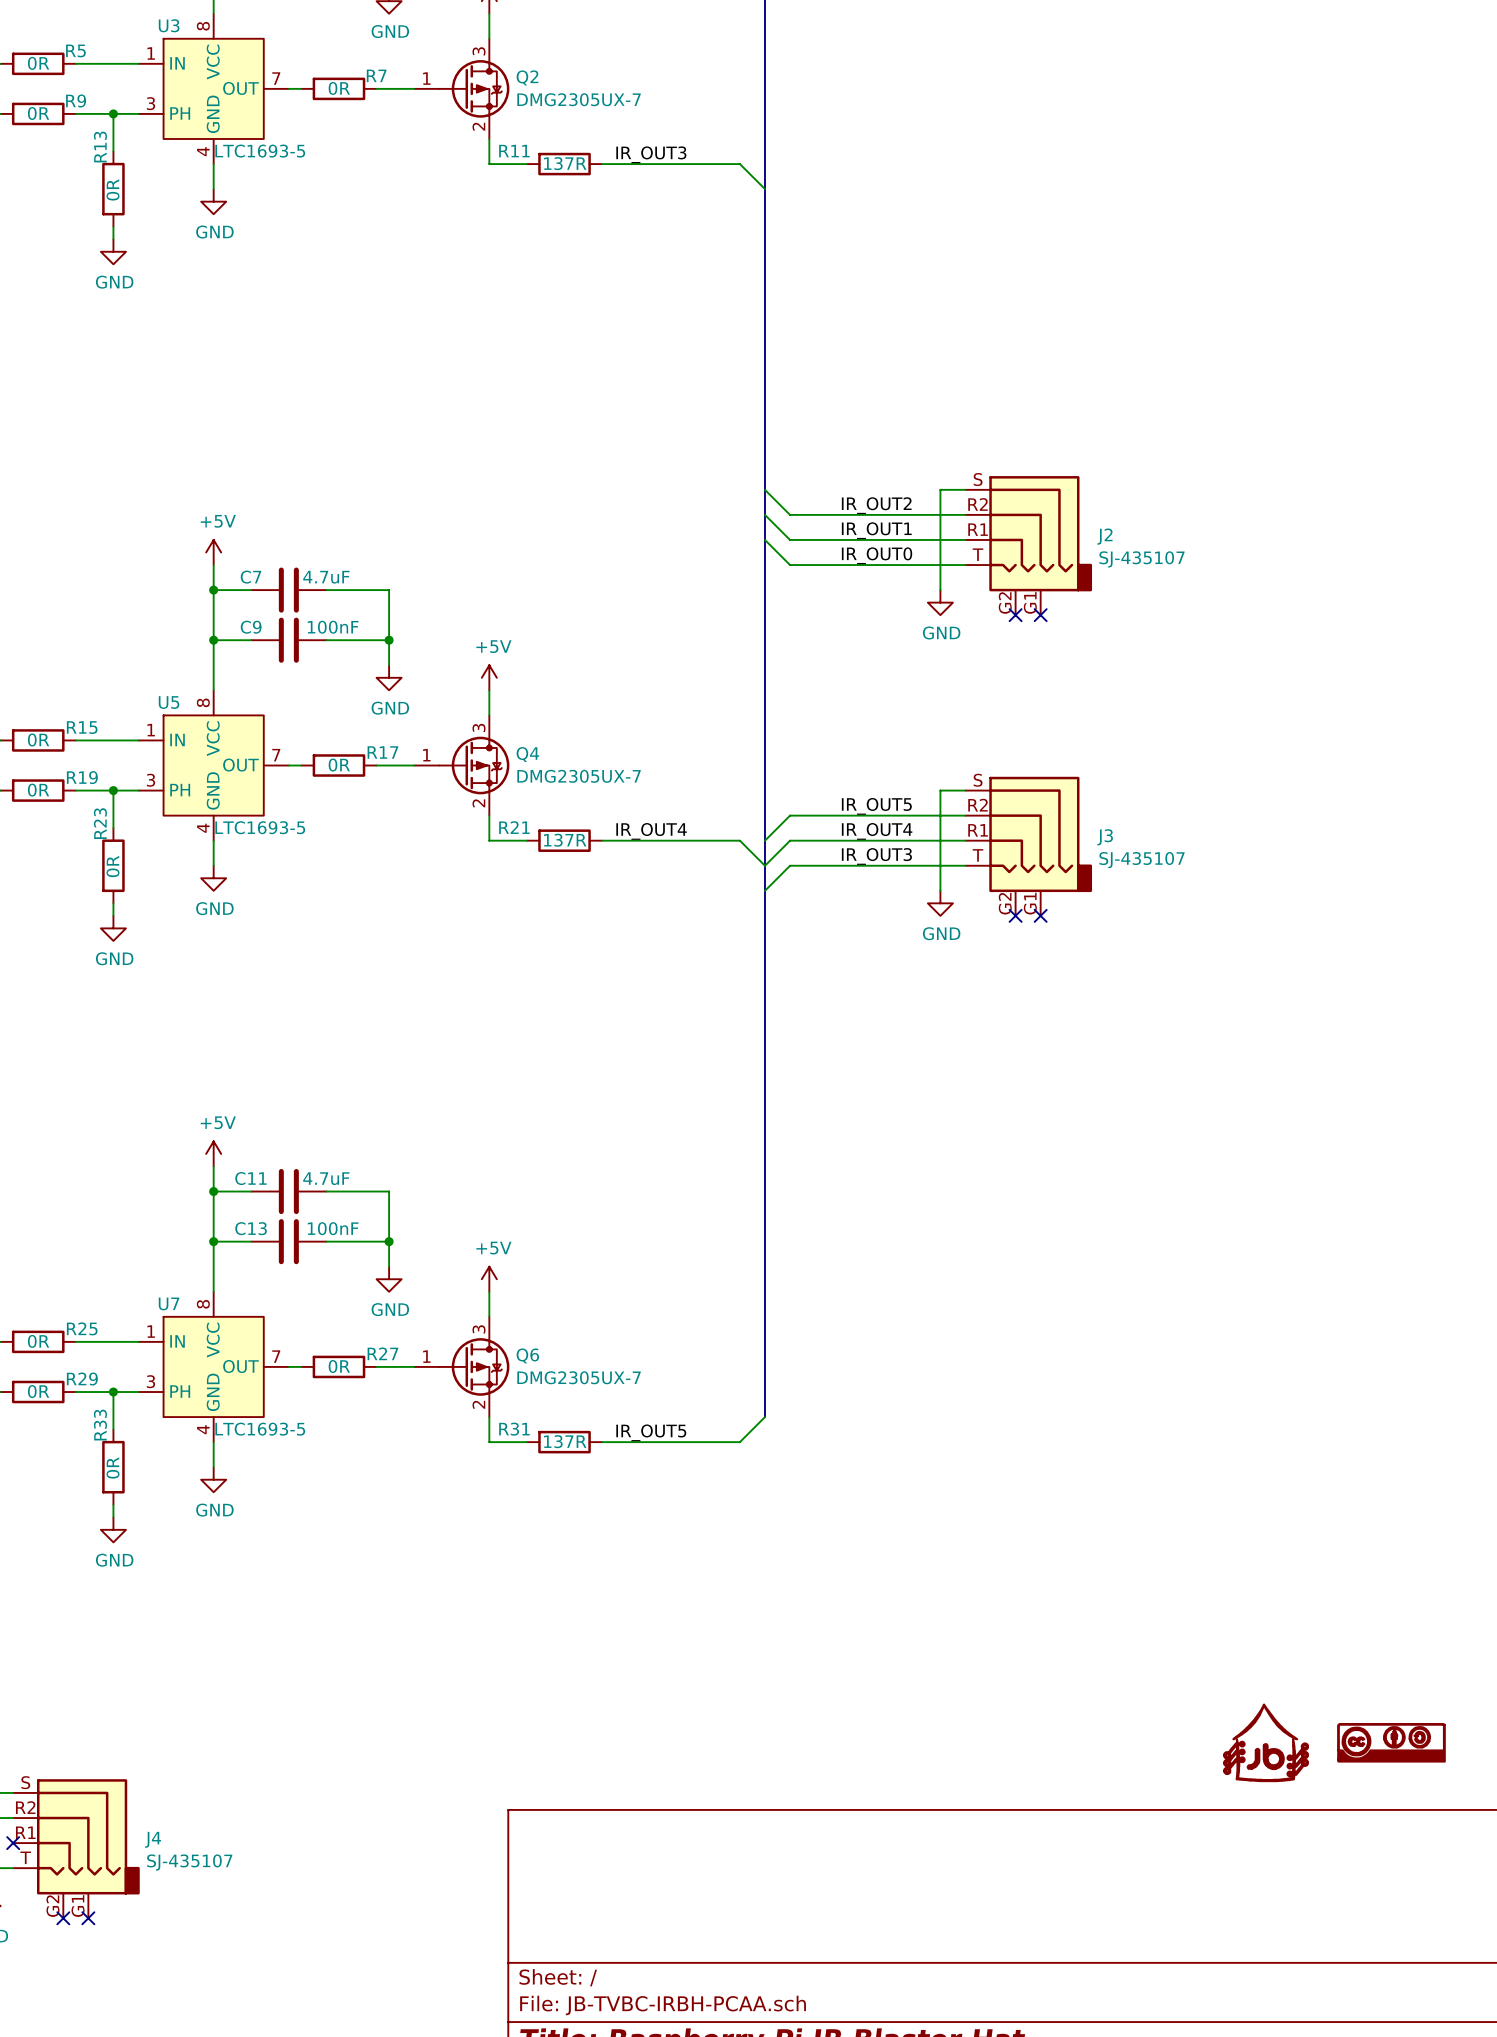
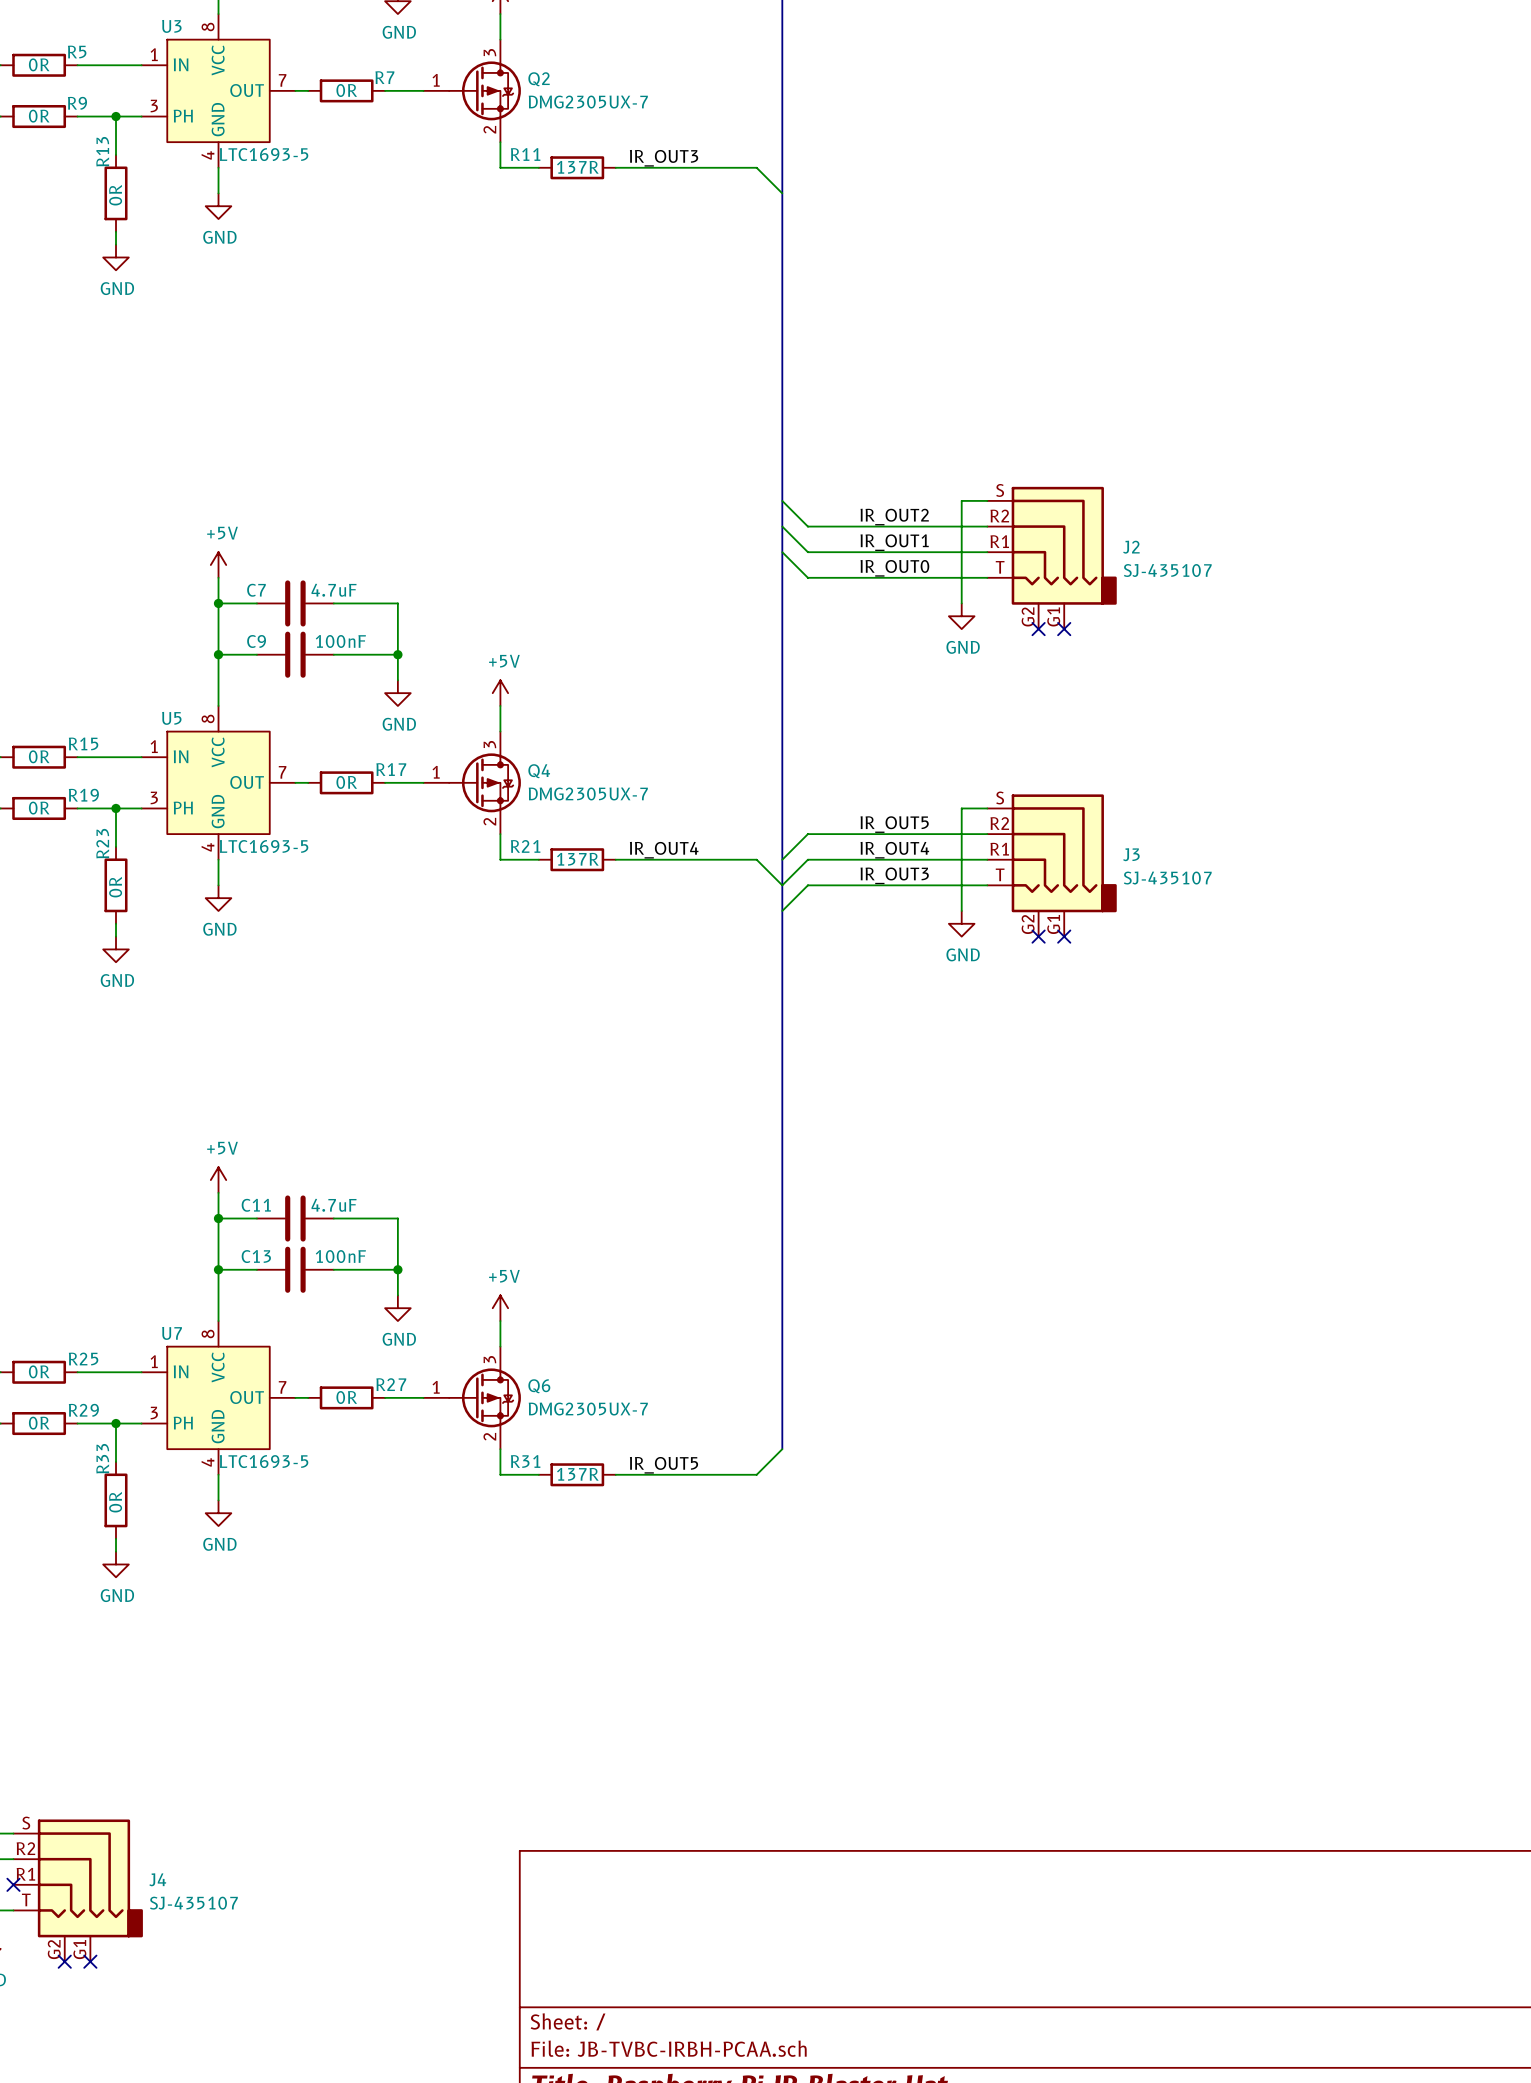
part: (1266, 1742) -> none
part: (1391, 1742) -> none

